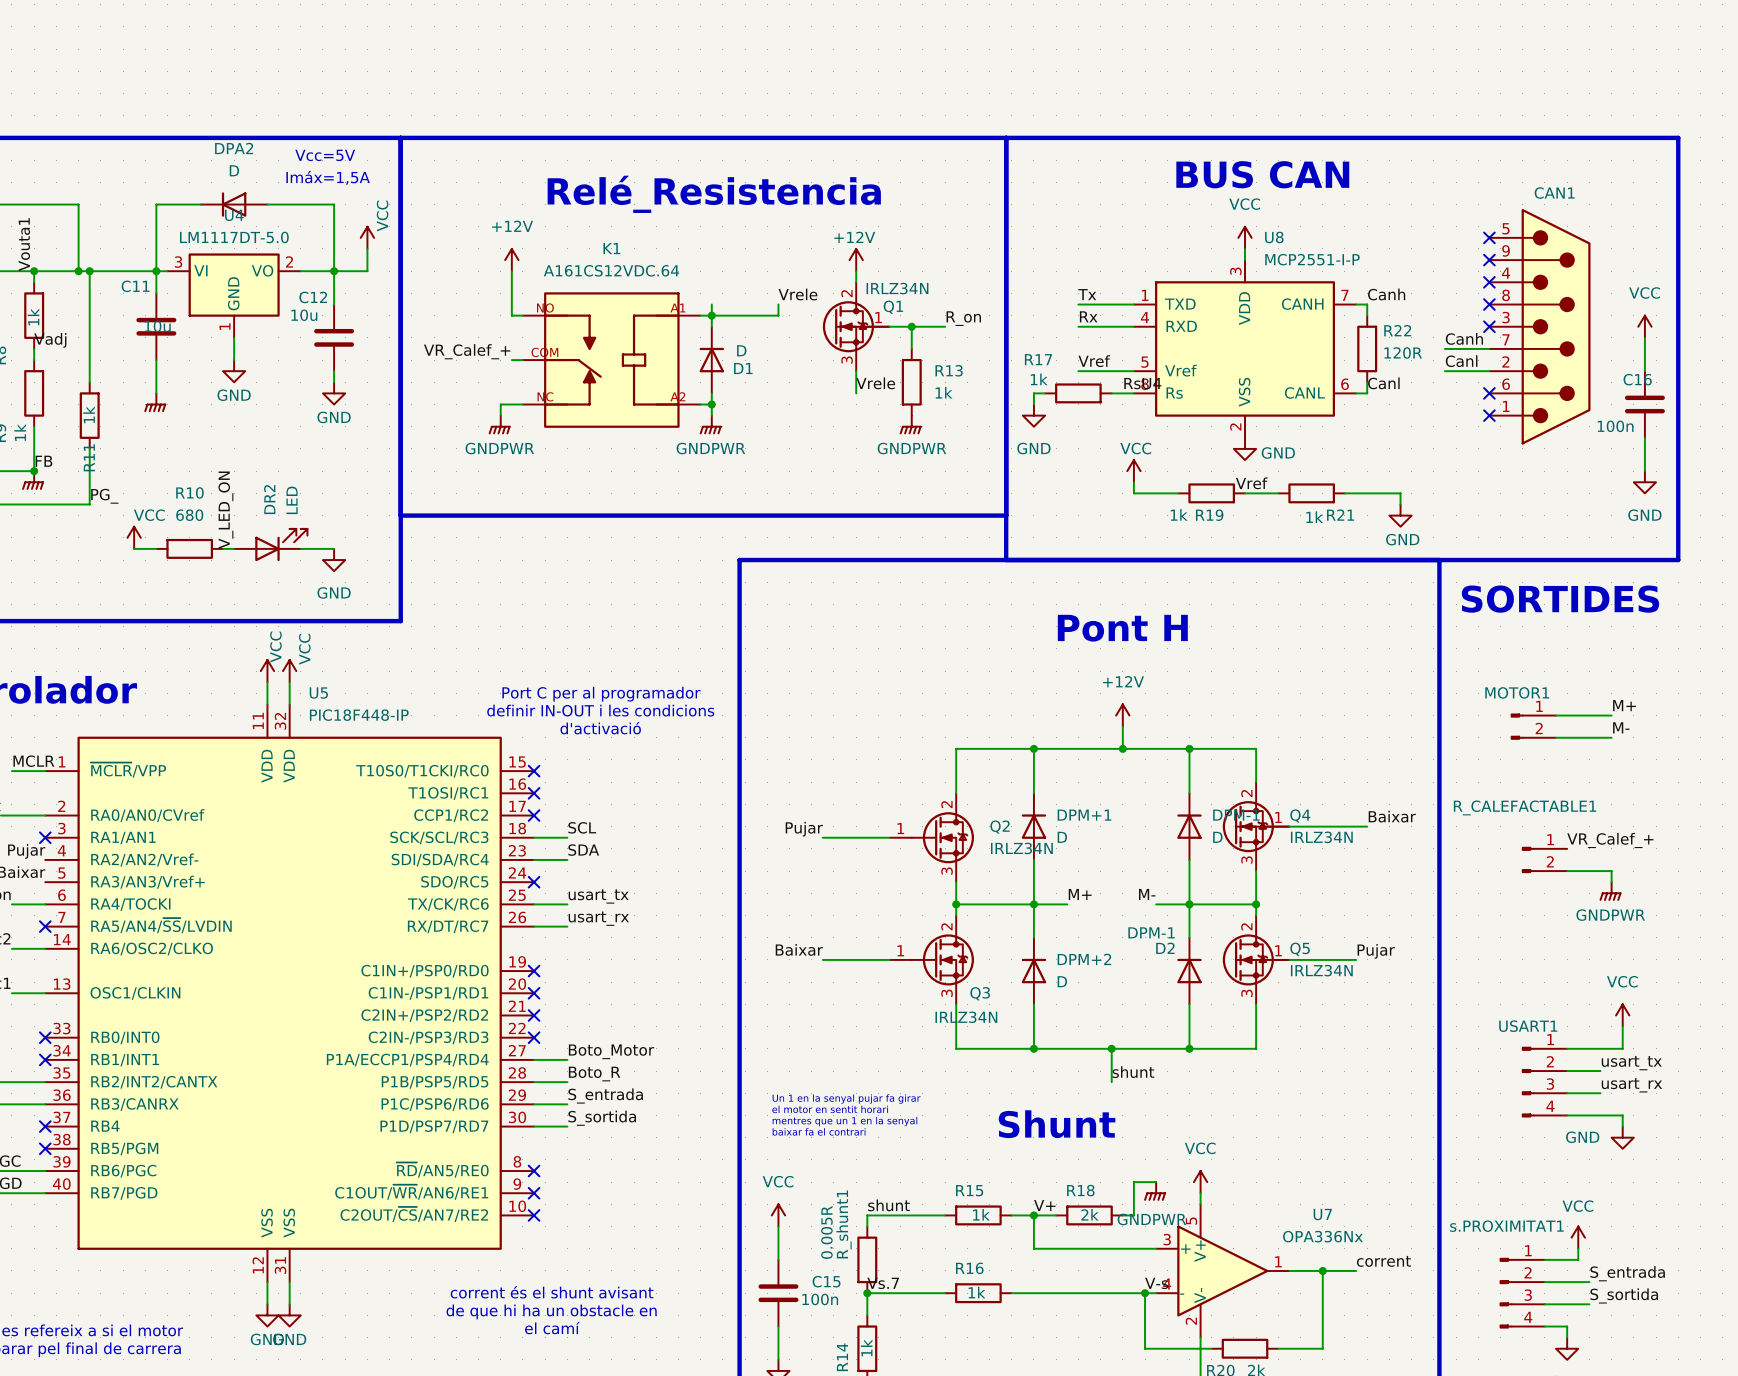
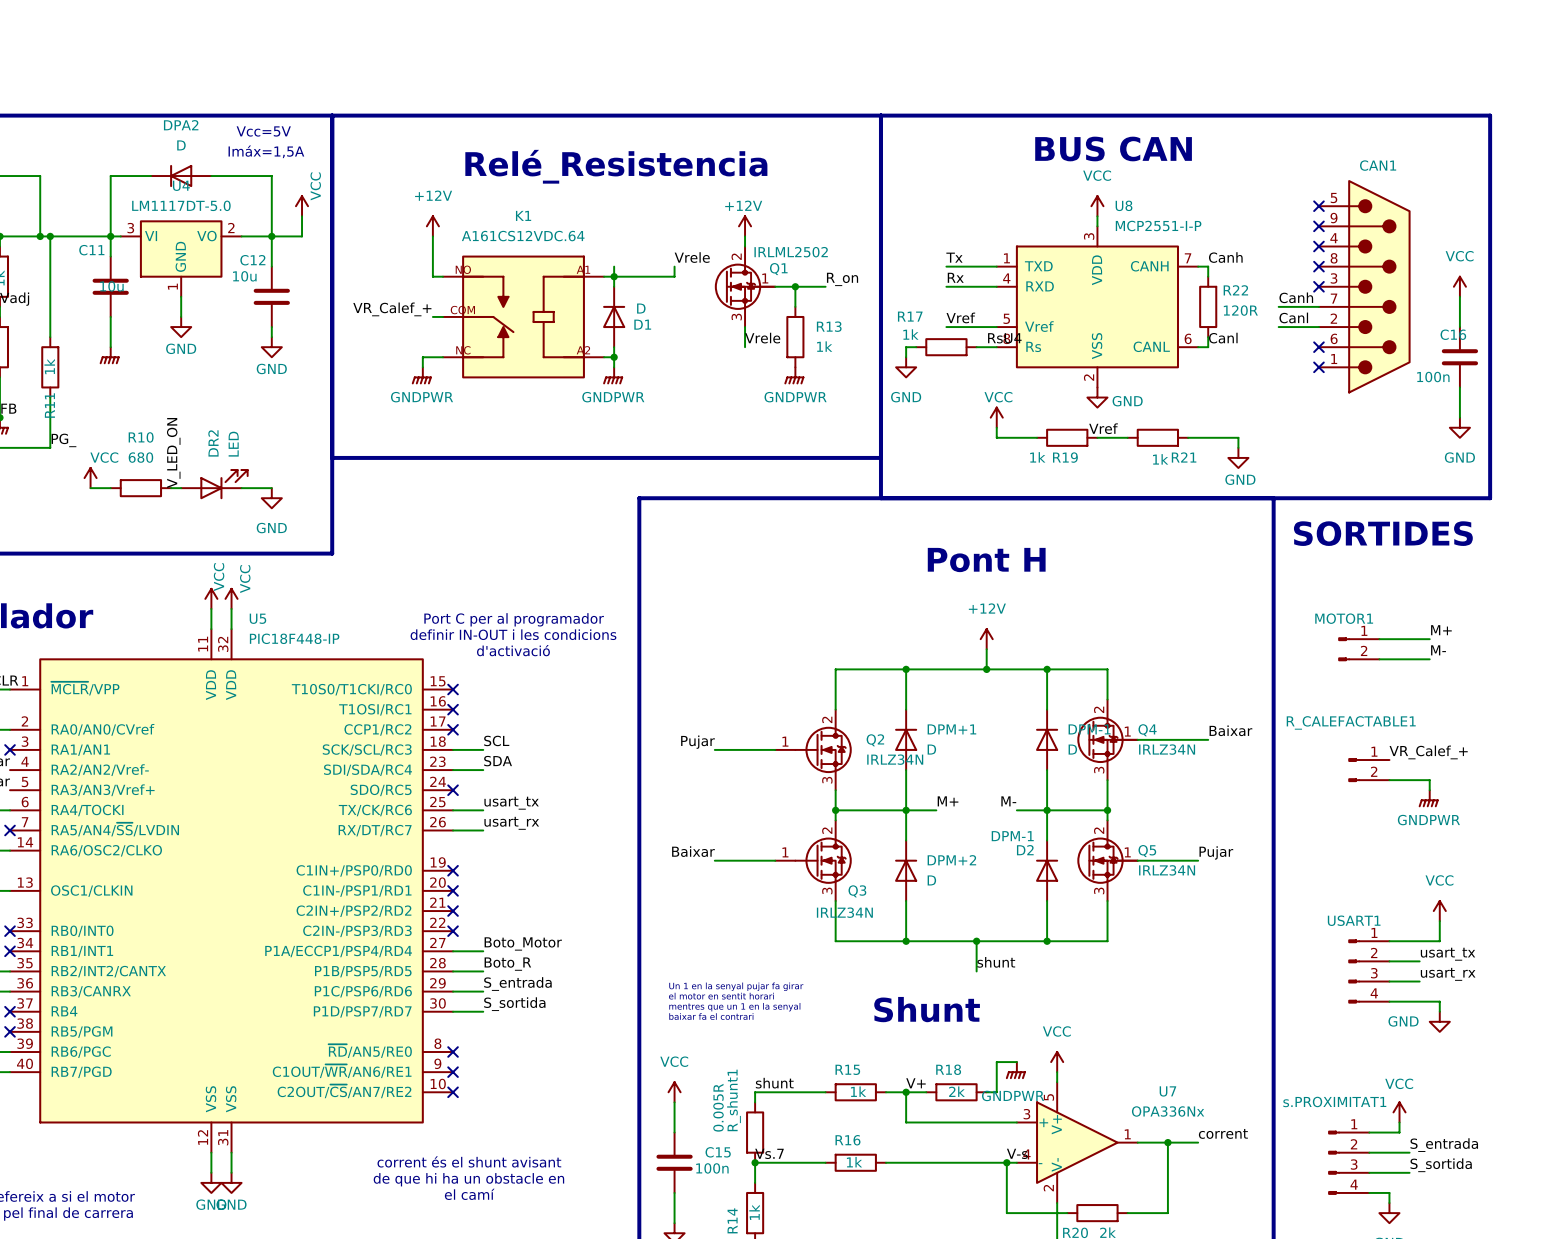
Q1 value: IRLZ34N (897, 288) -> IRLML2502 (791, 252)

